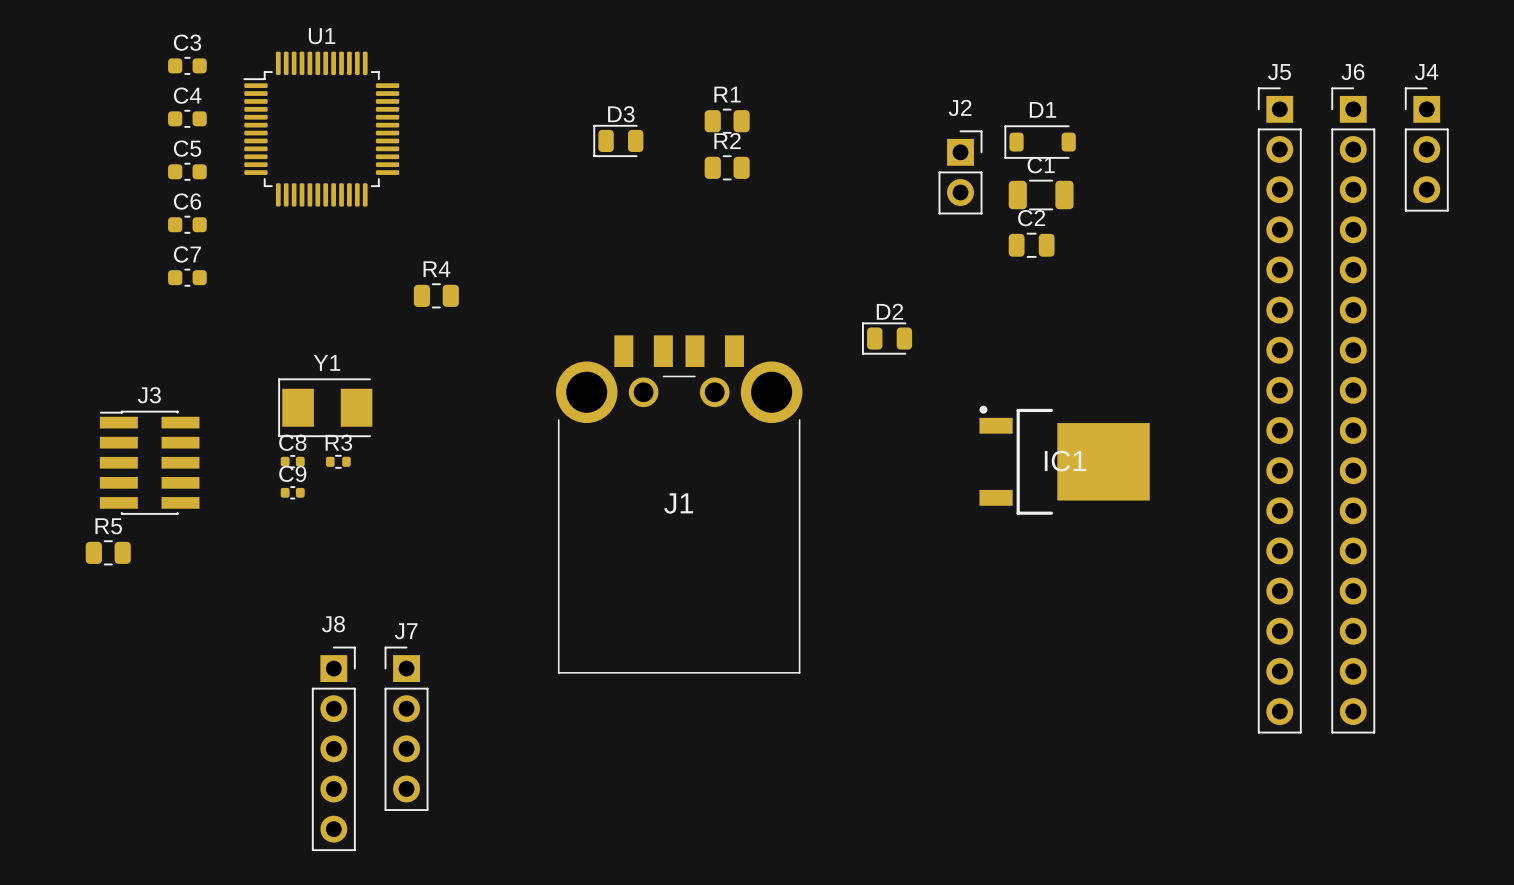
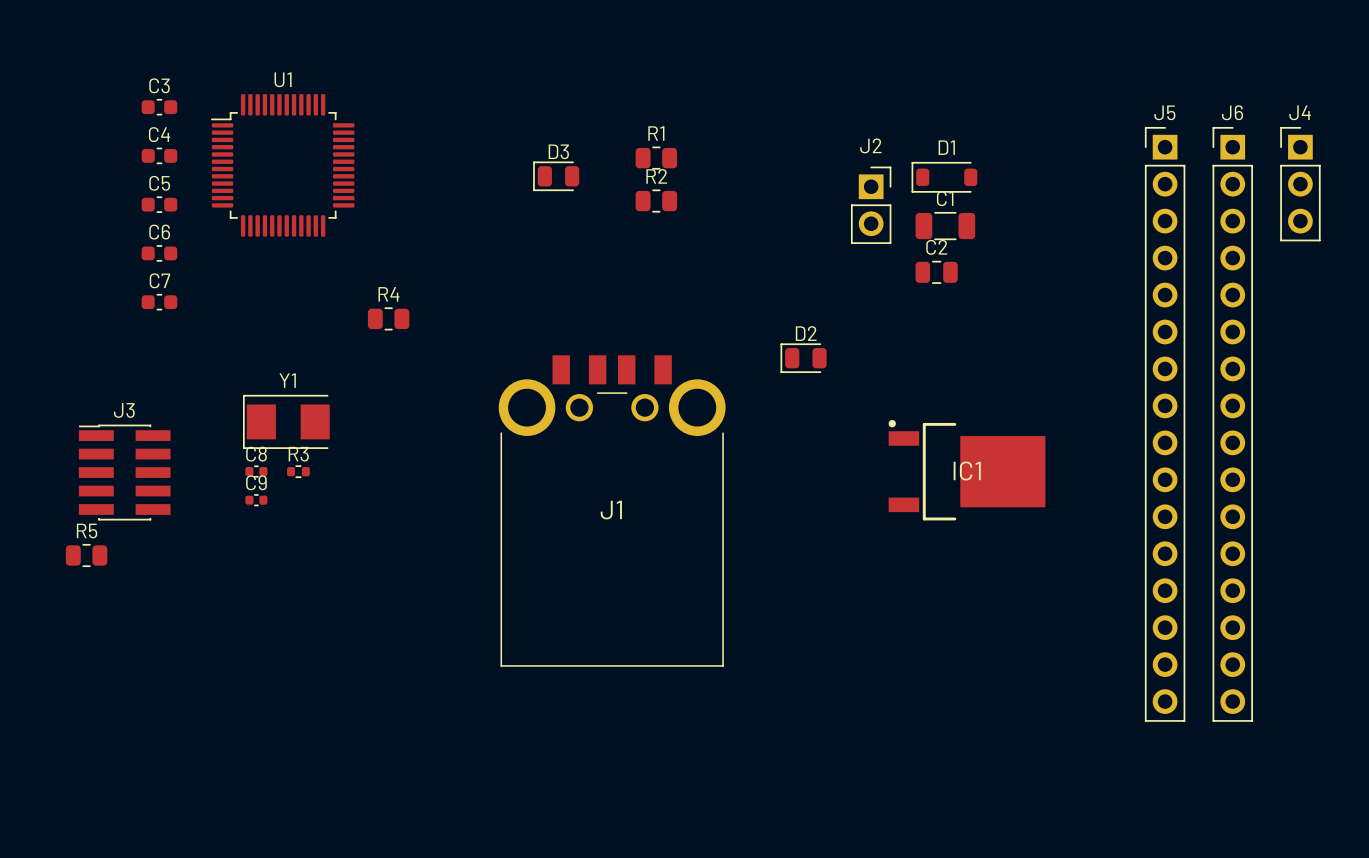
J7: (406, 728) -> none
J8: (333, 748) -> none

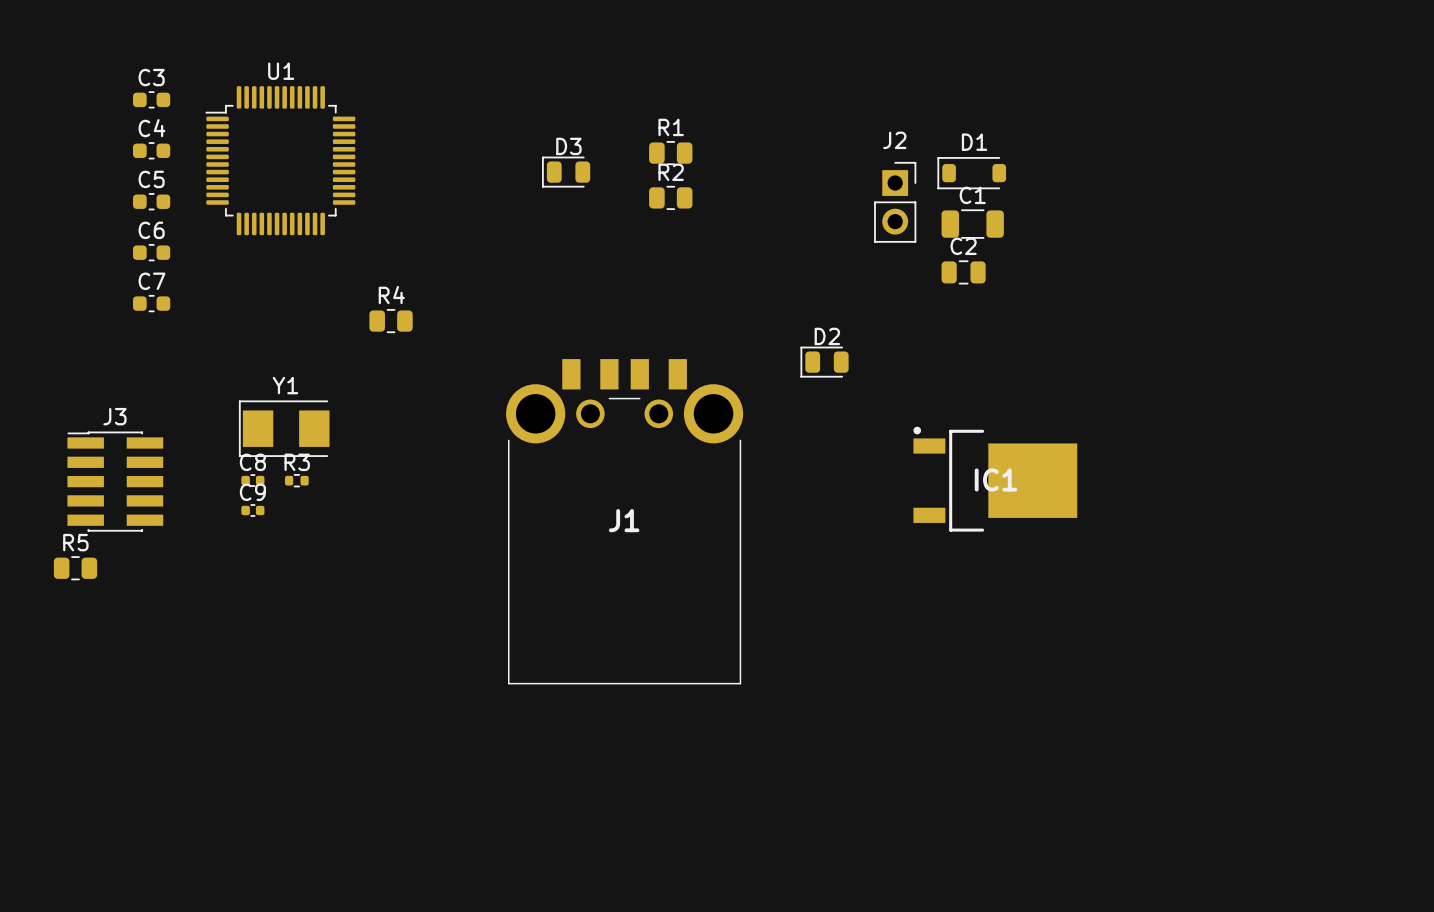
J4: (1300, 184) -> none
J5: (1165, 424) -> none
J6: (1232, 424) -> none

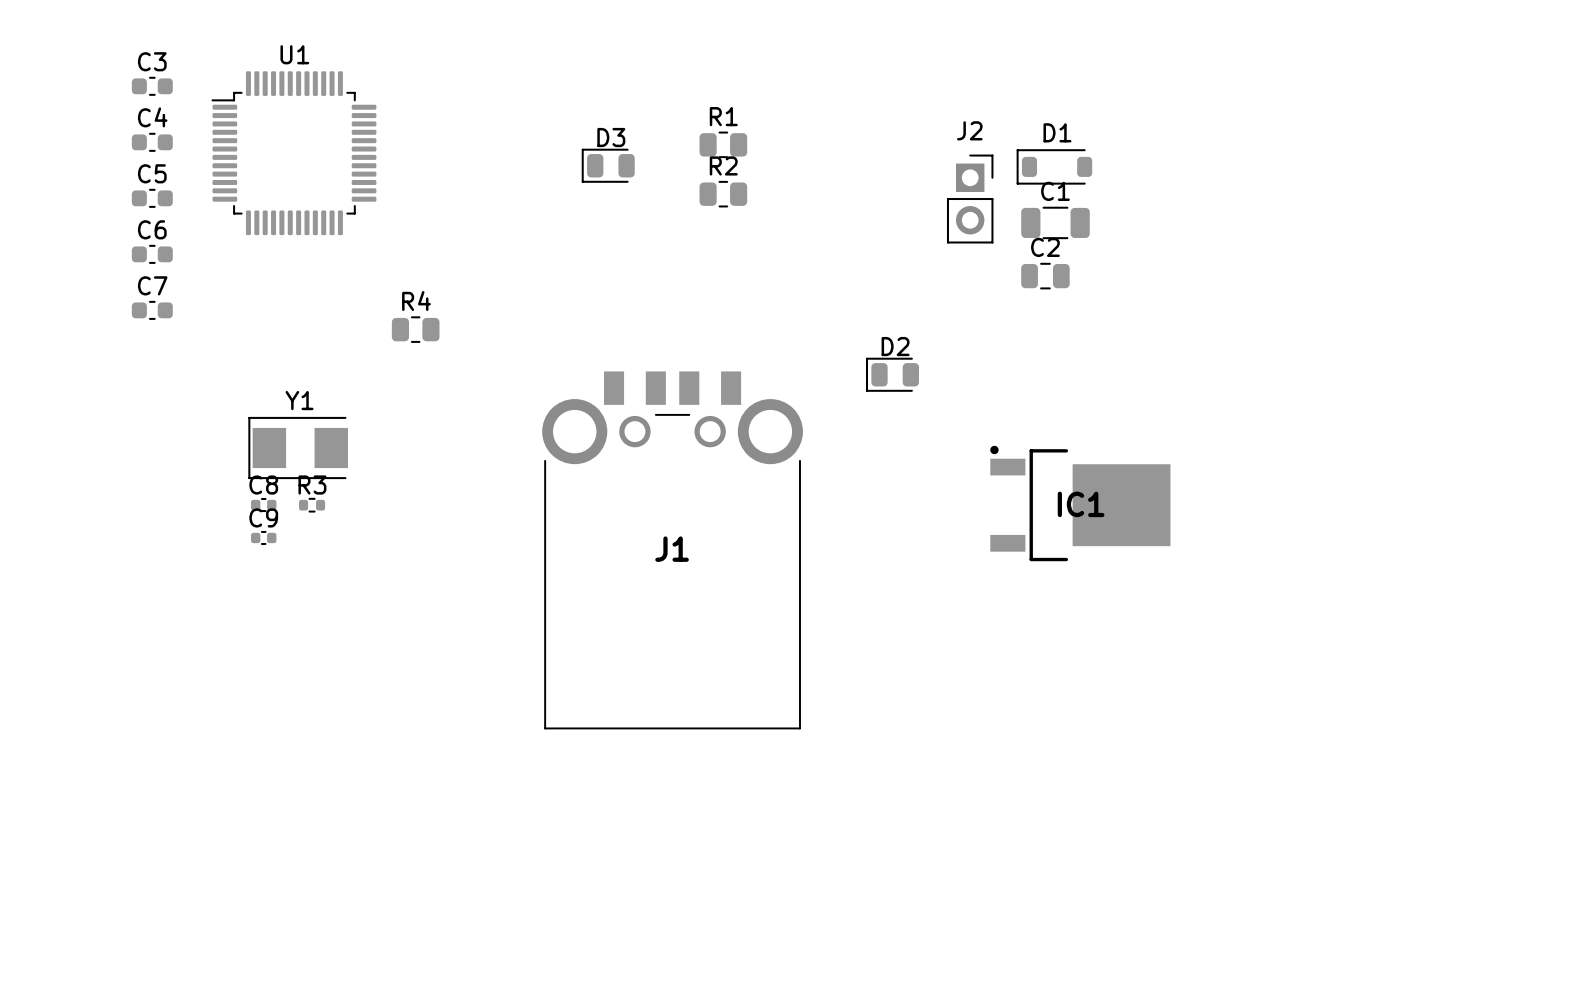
J3: (115, 481) -> none
R5: (75, 568) -> none

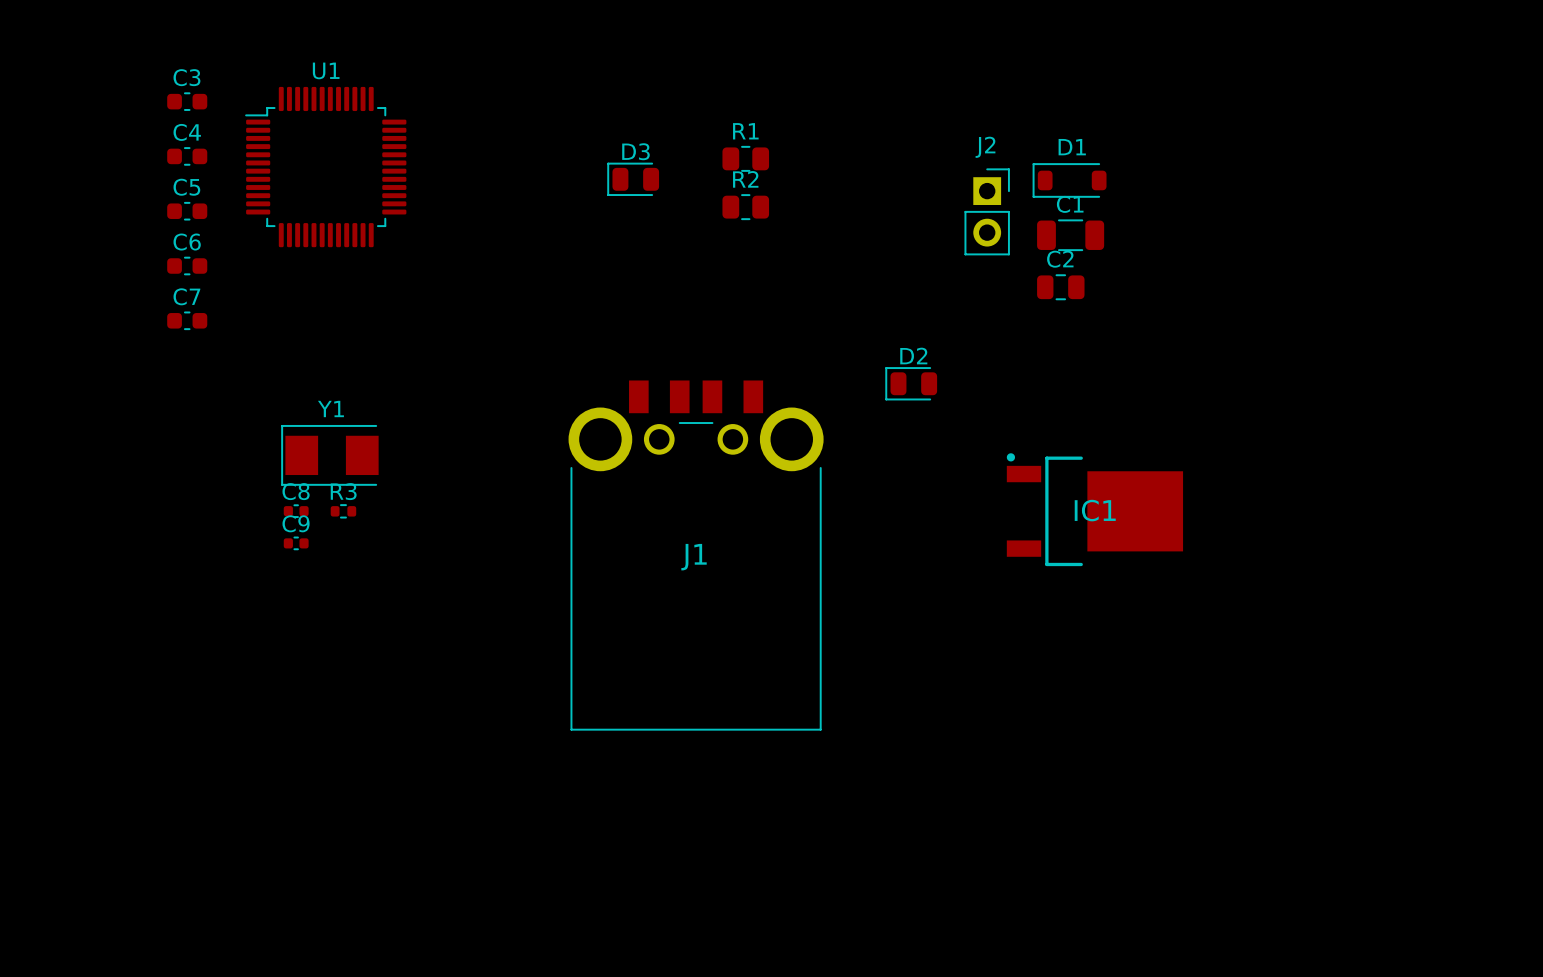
R4: (415, 329) -> none

